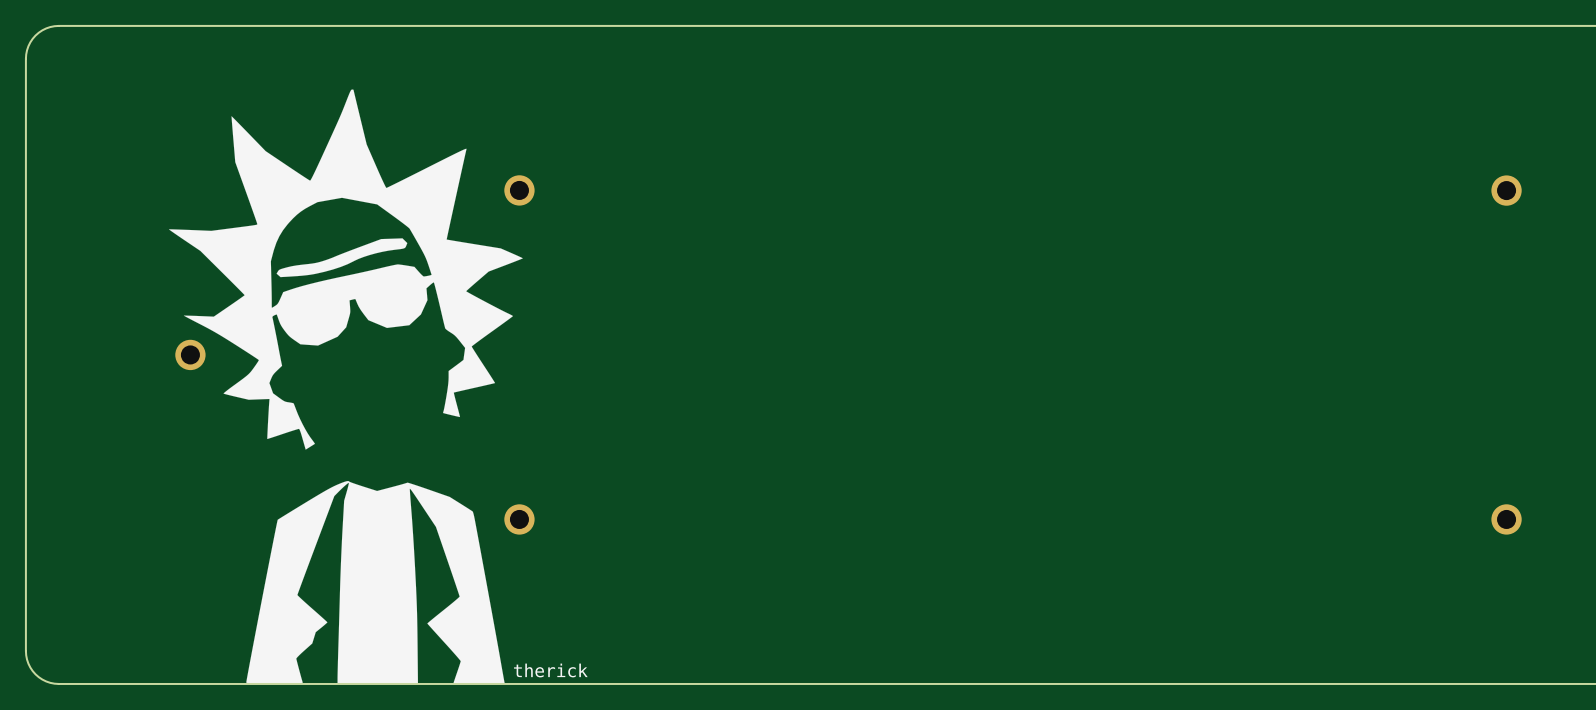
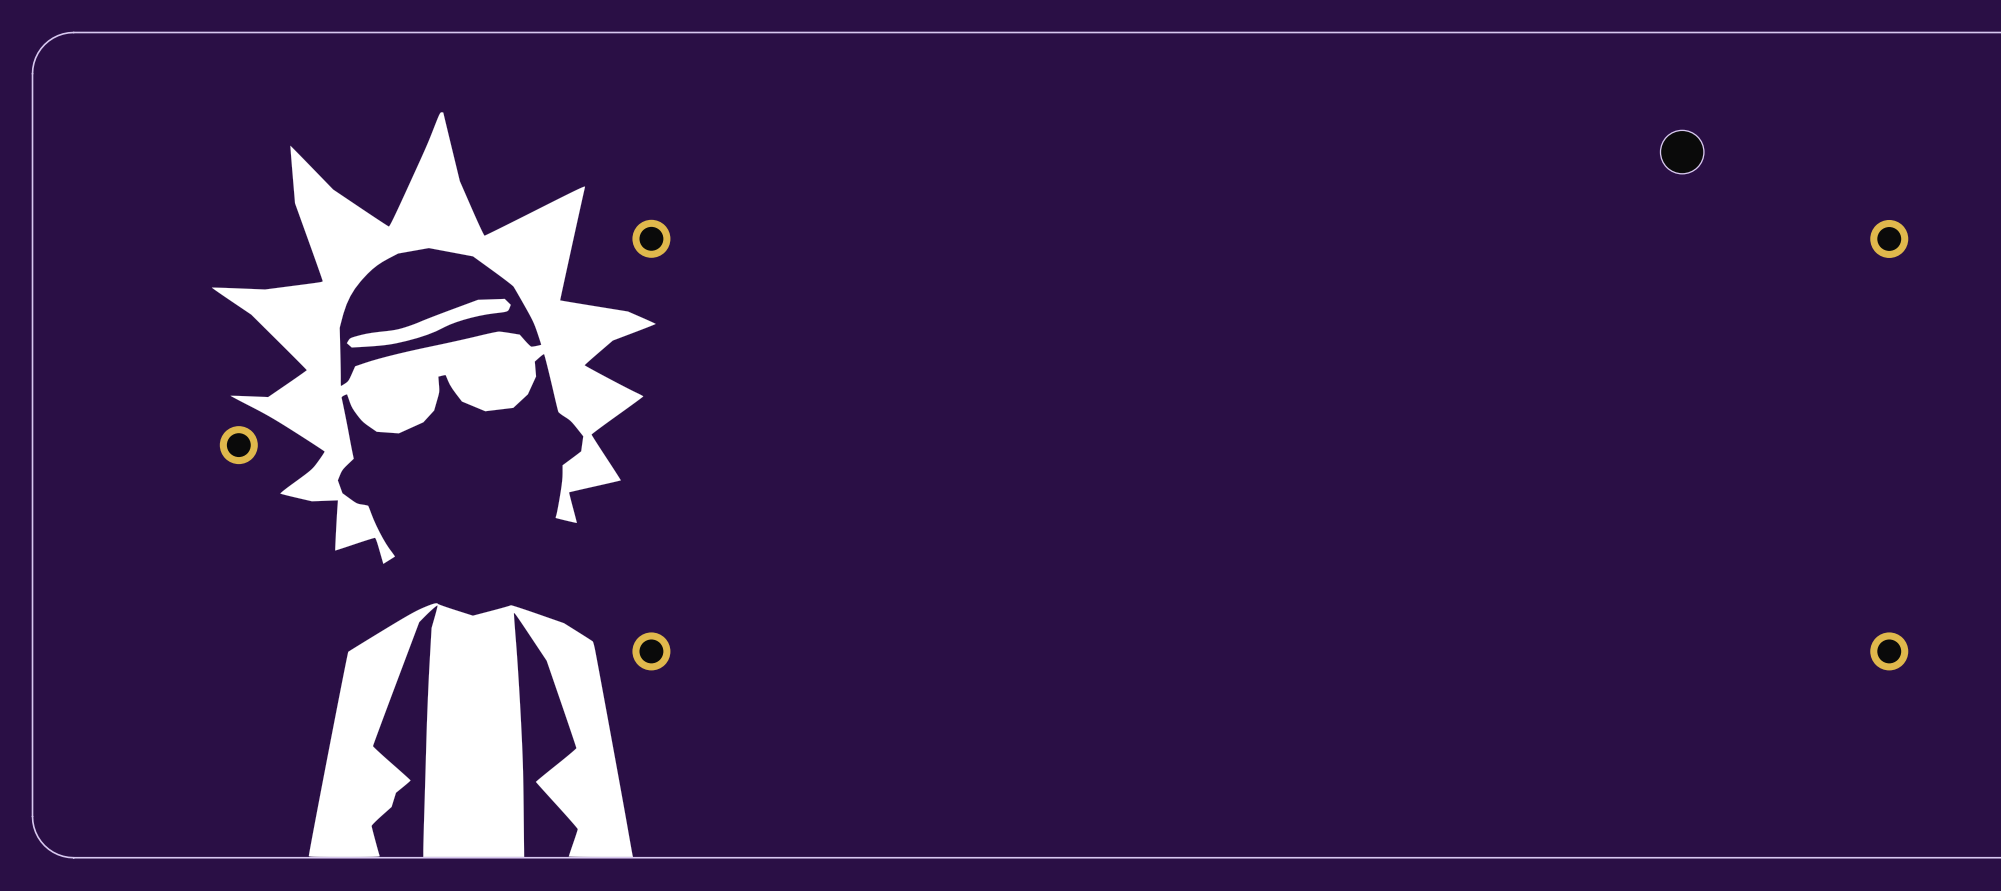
part: none -> (1682, 152)
text: therick (550, 670) -> none

